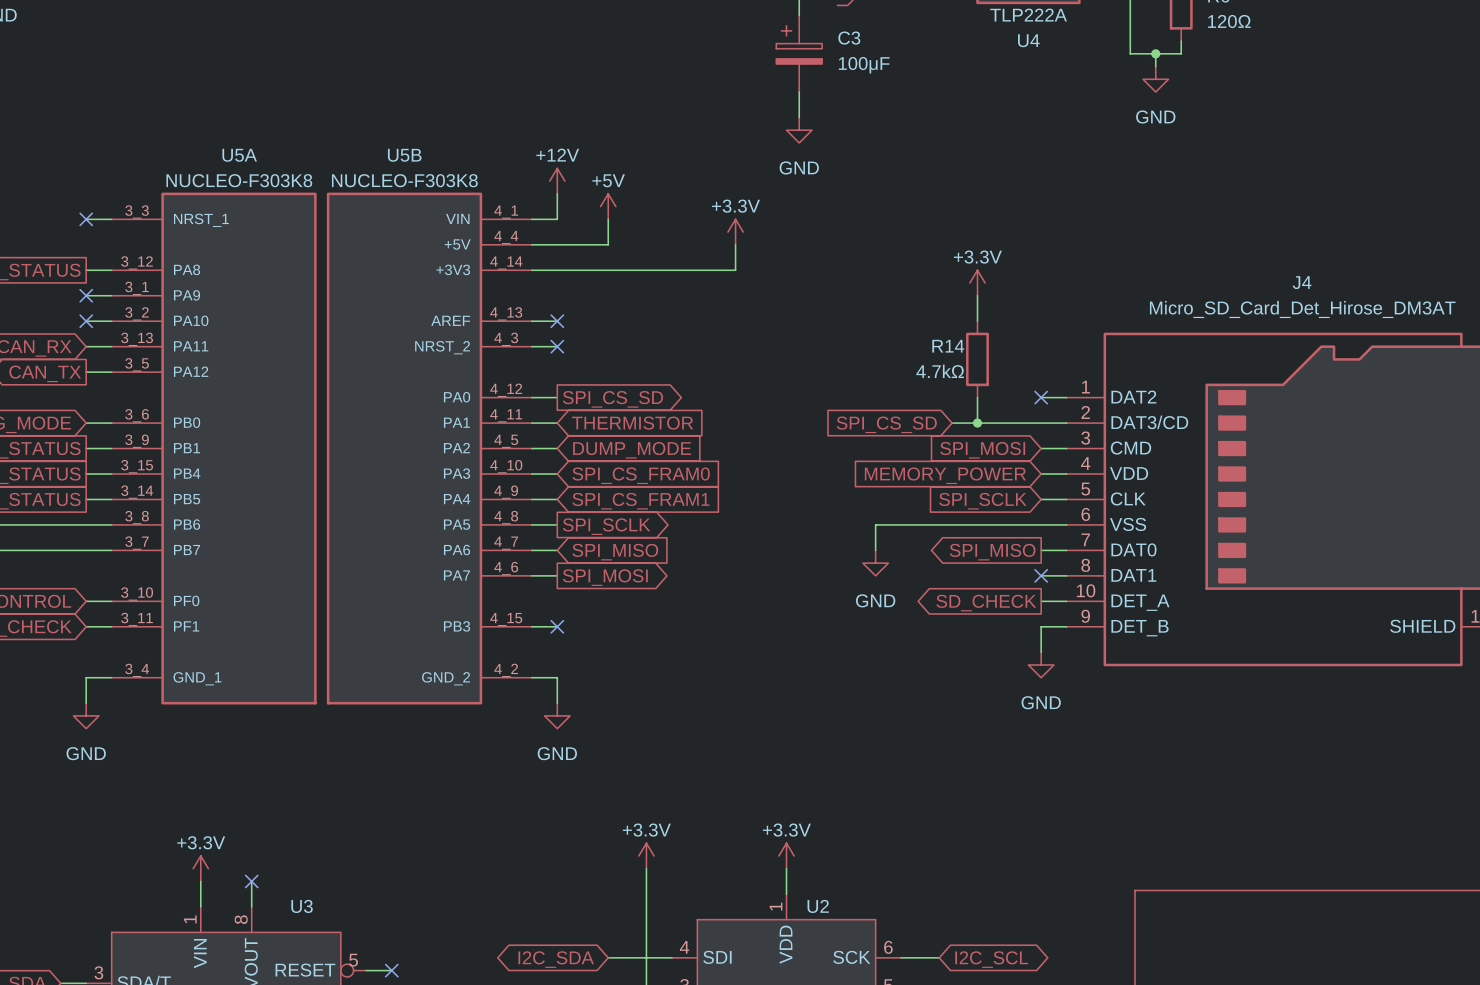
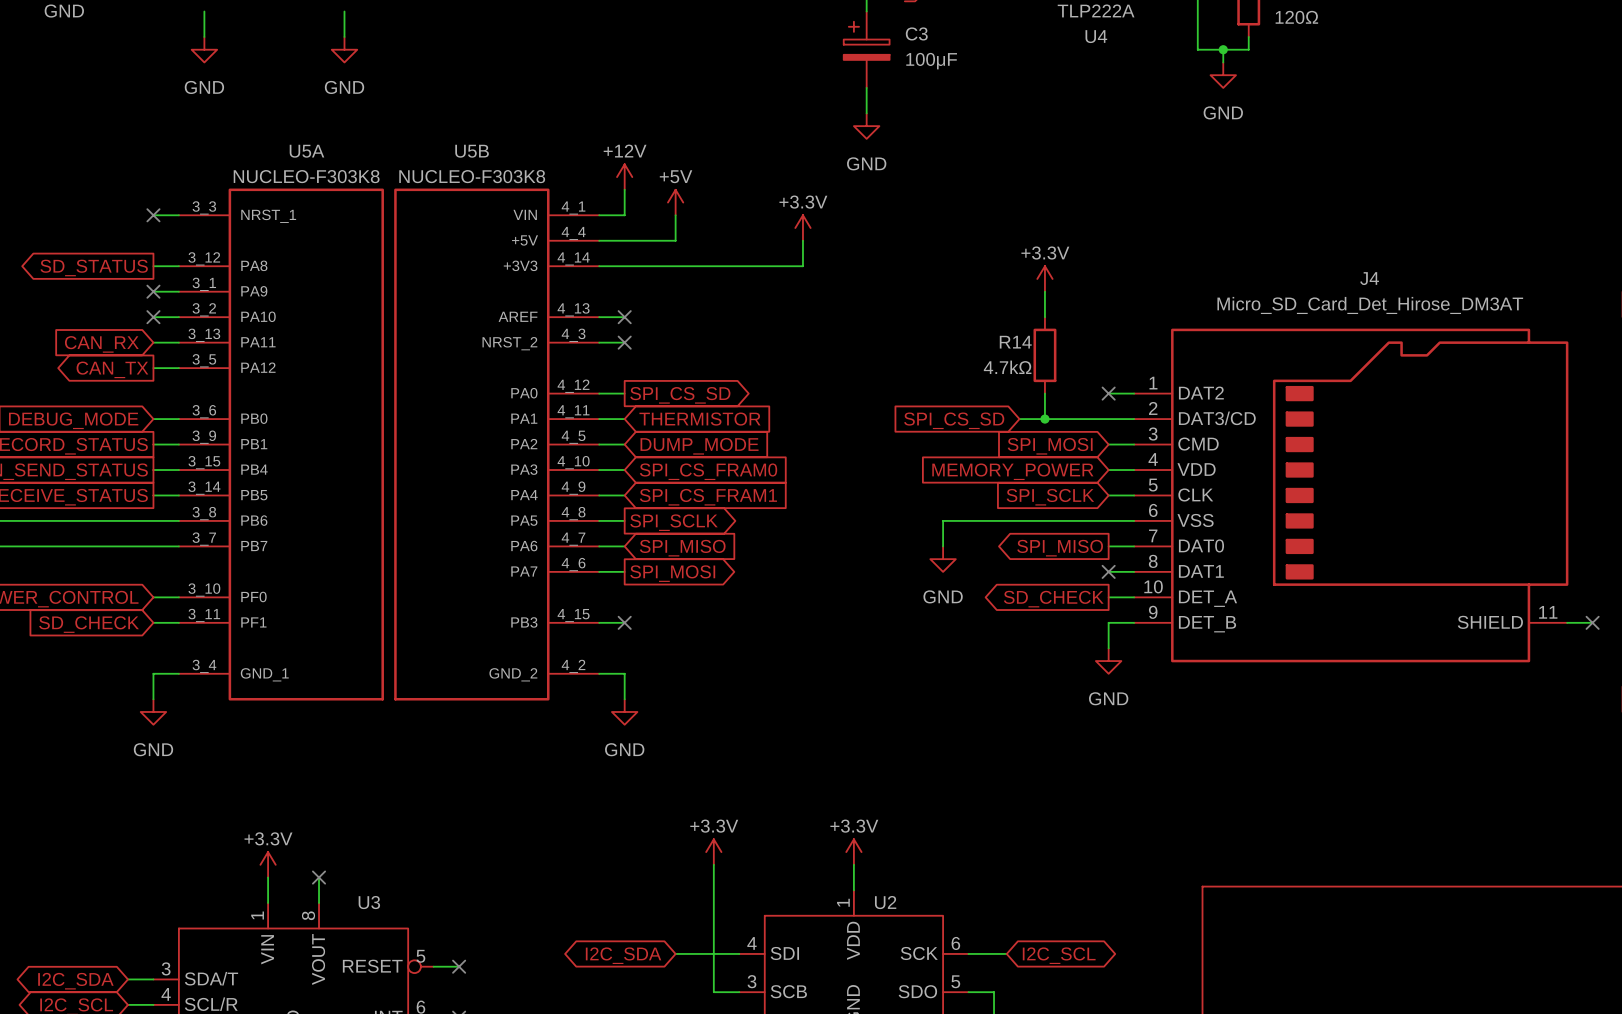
wire: none -> (204, 11) (204, 36)
wire: none -> (344, 11) (344, 36)
power symbol: none -> GND (204, 49)
power symbol: none -> GND (344, 49)

